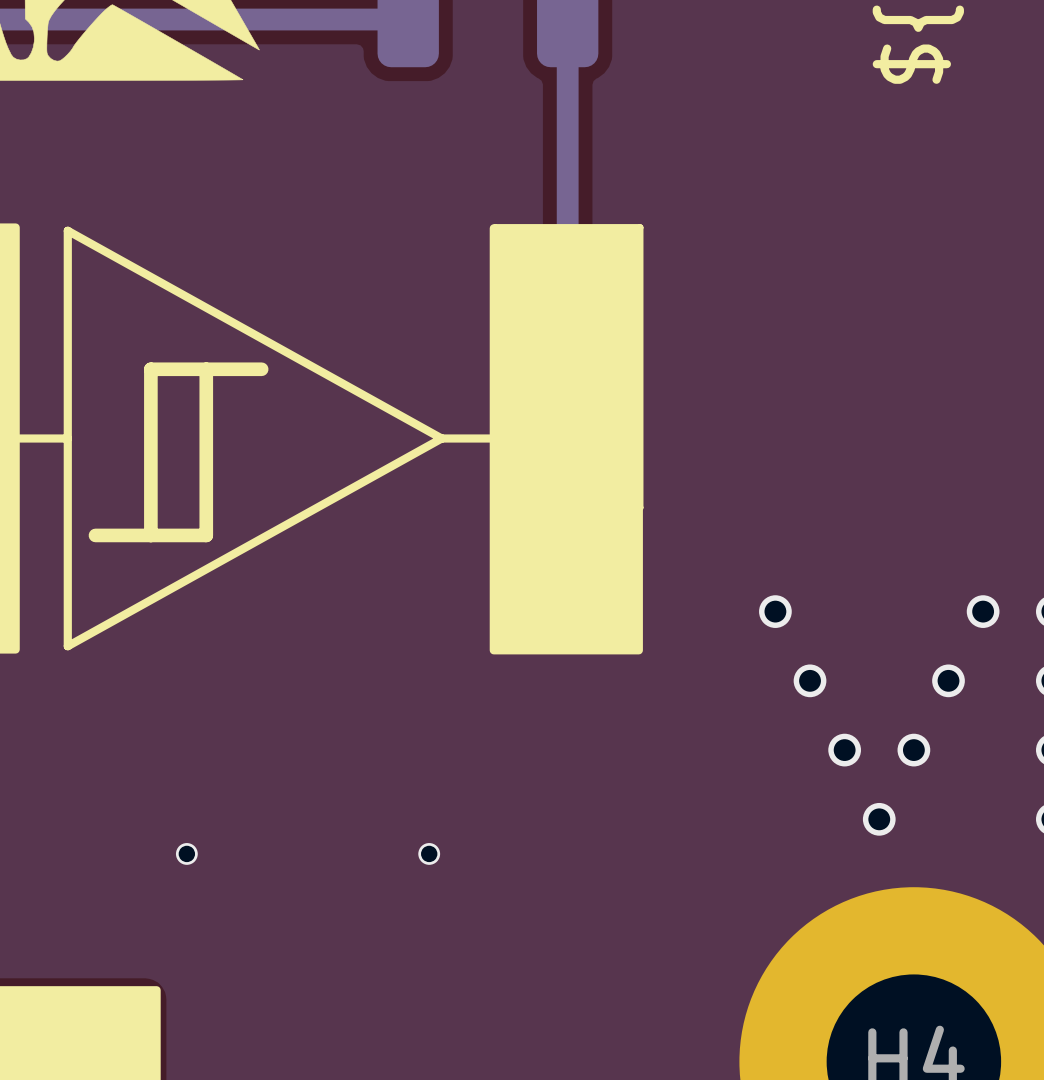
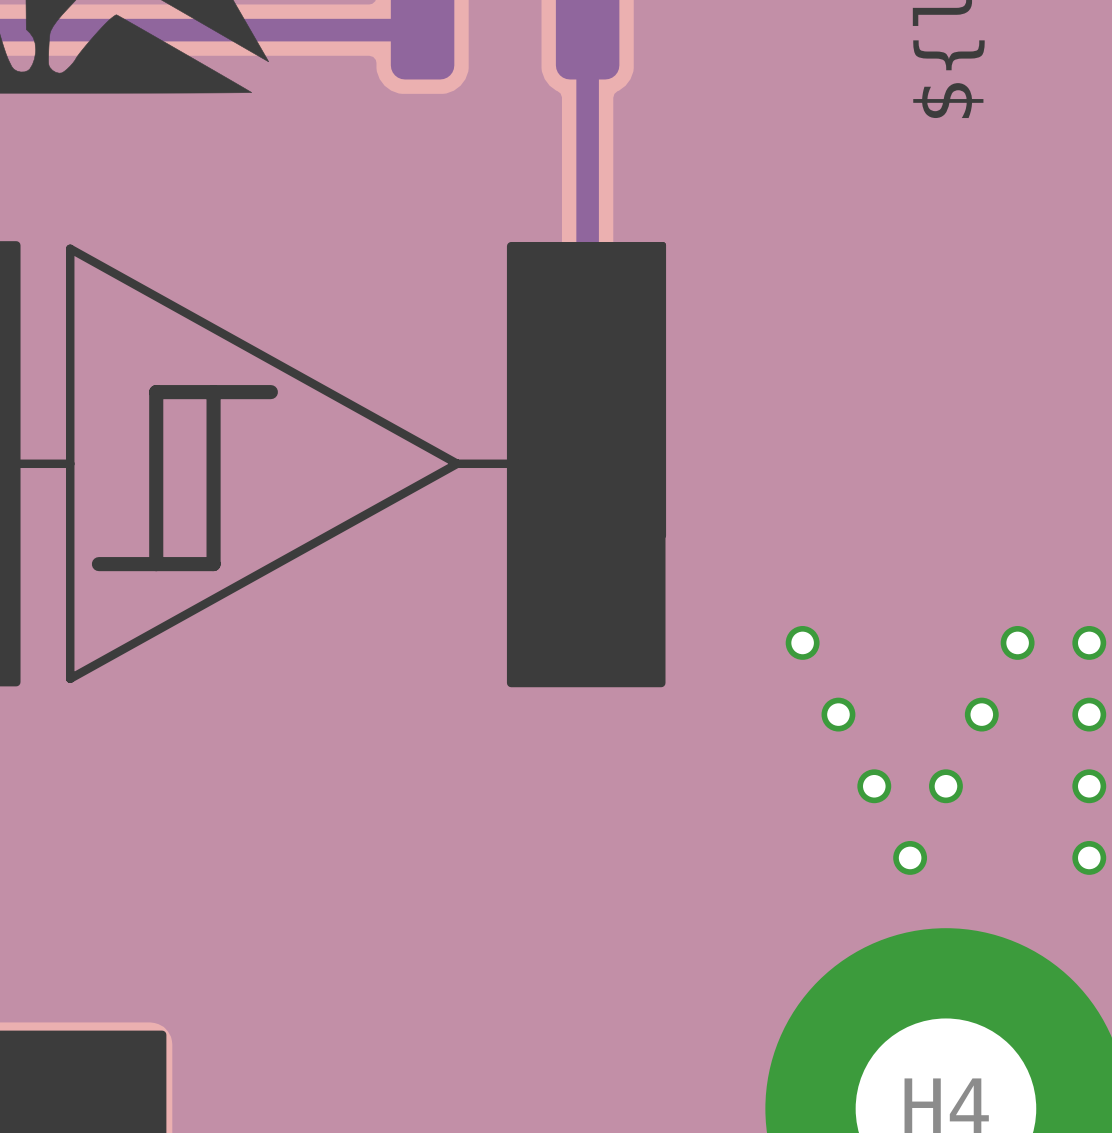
via: (186, 853) -> none
via: (429, 853) -> none

